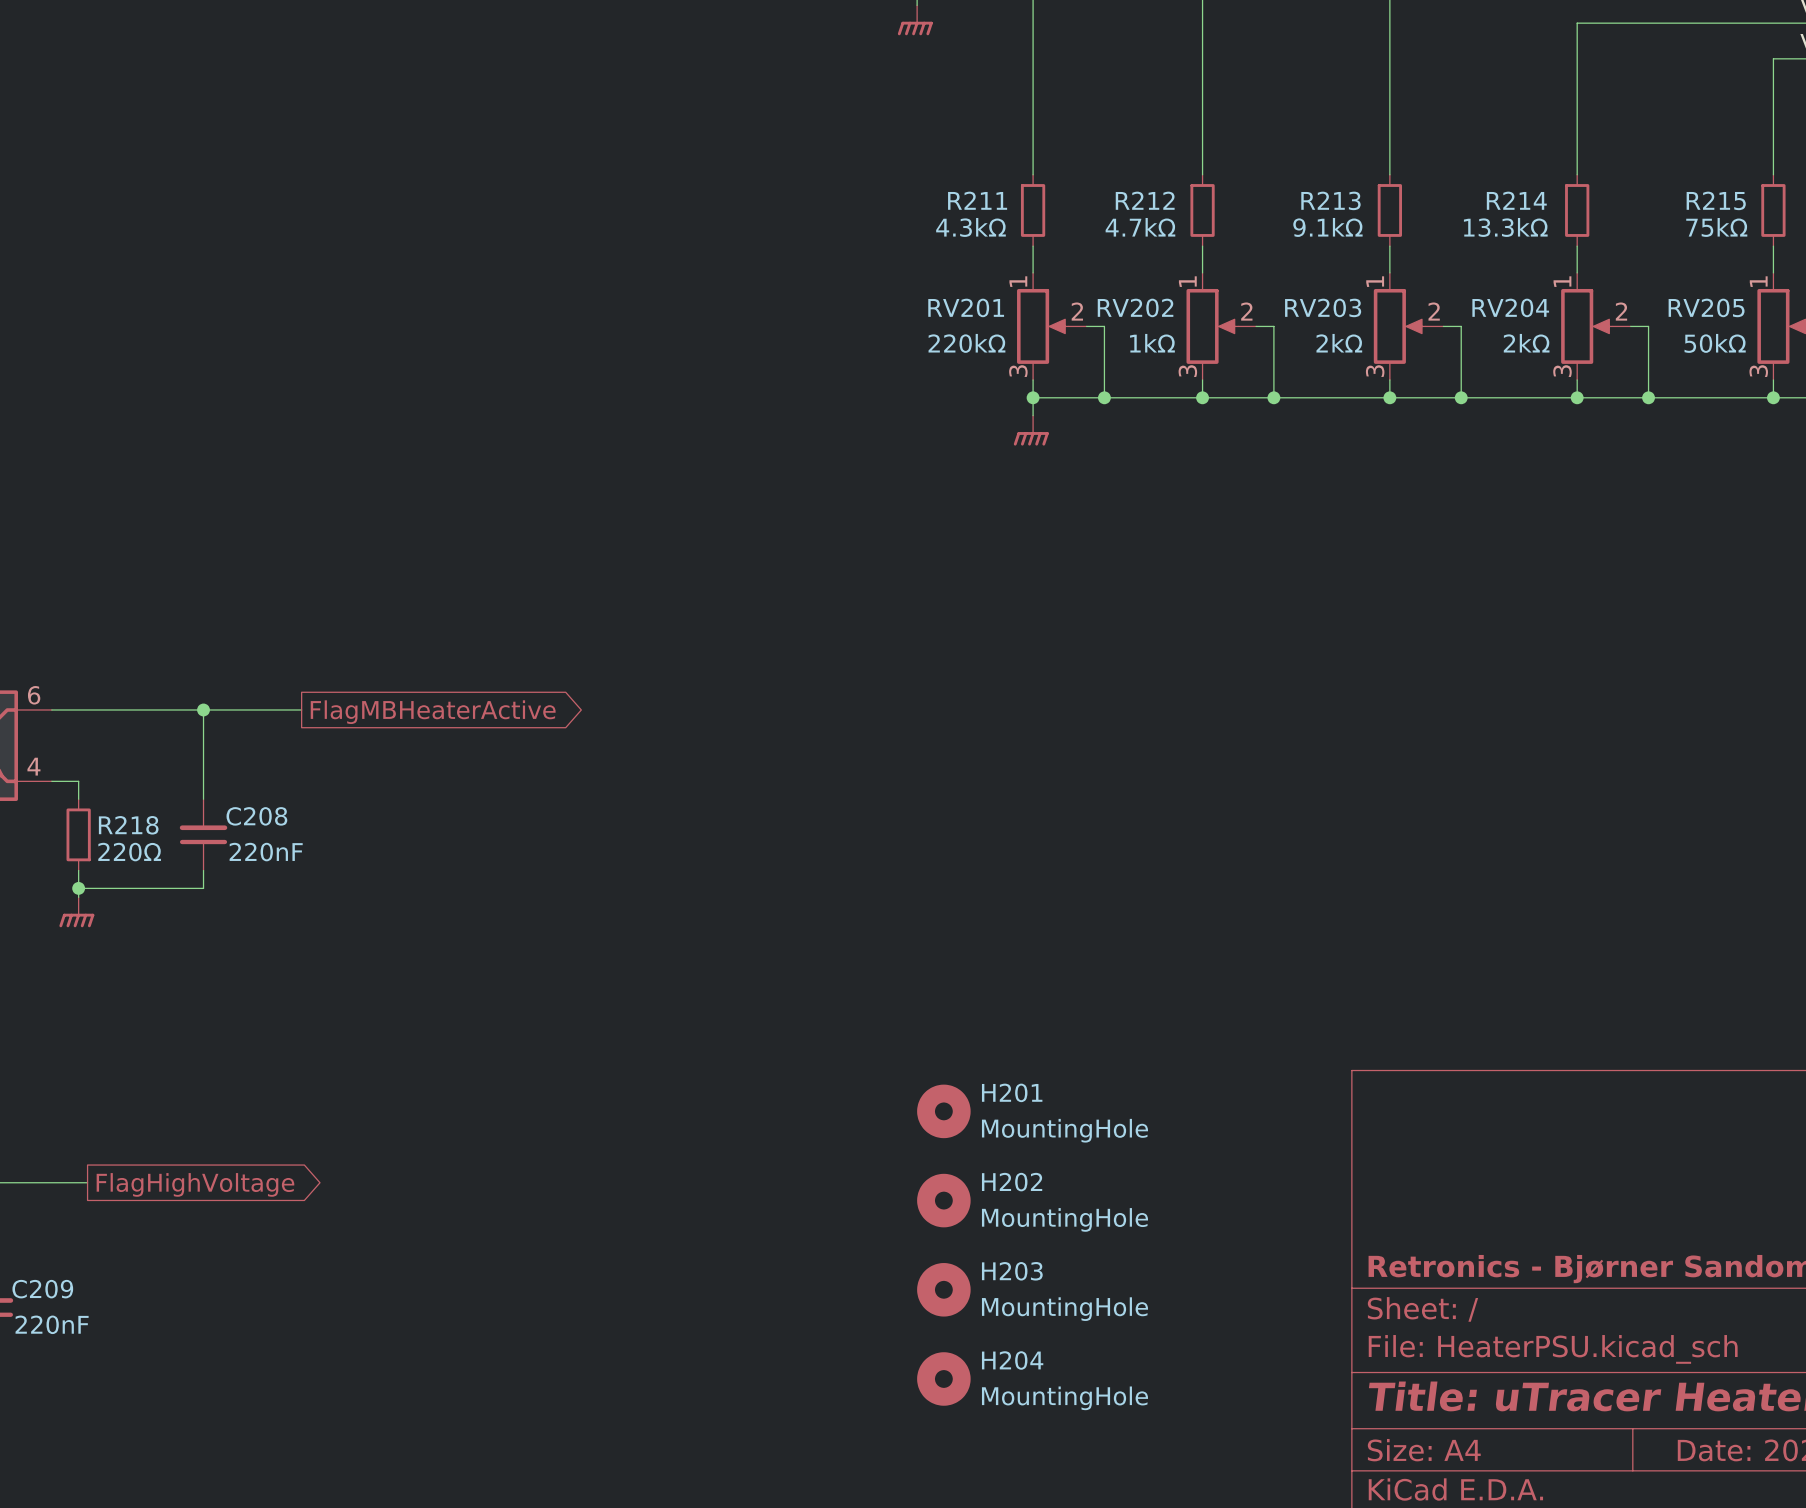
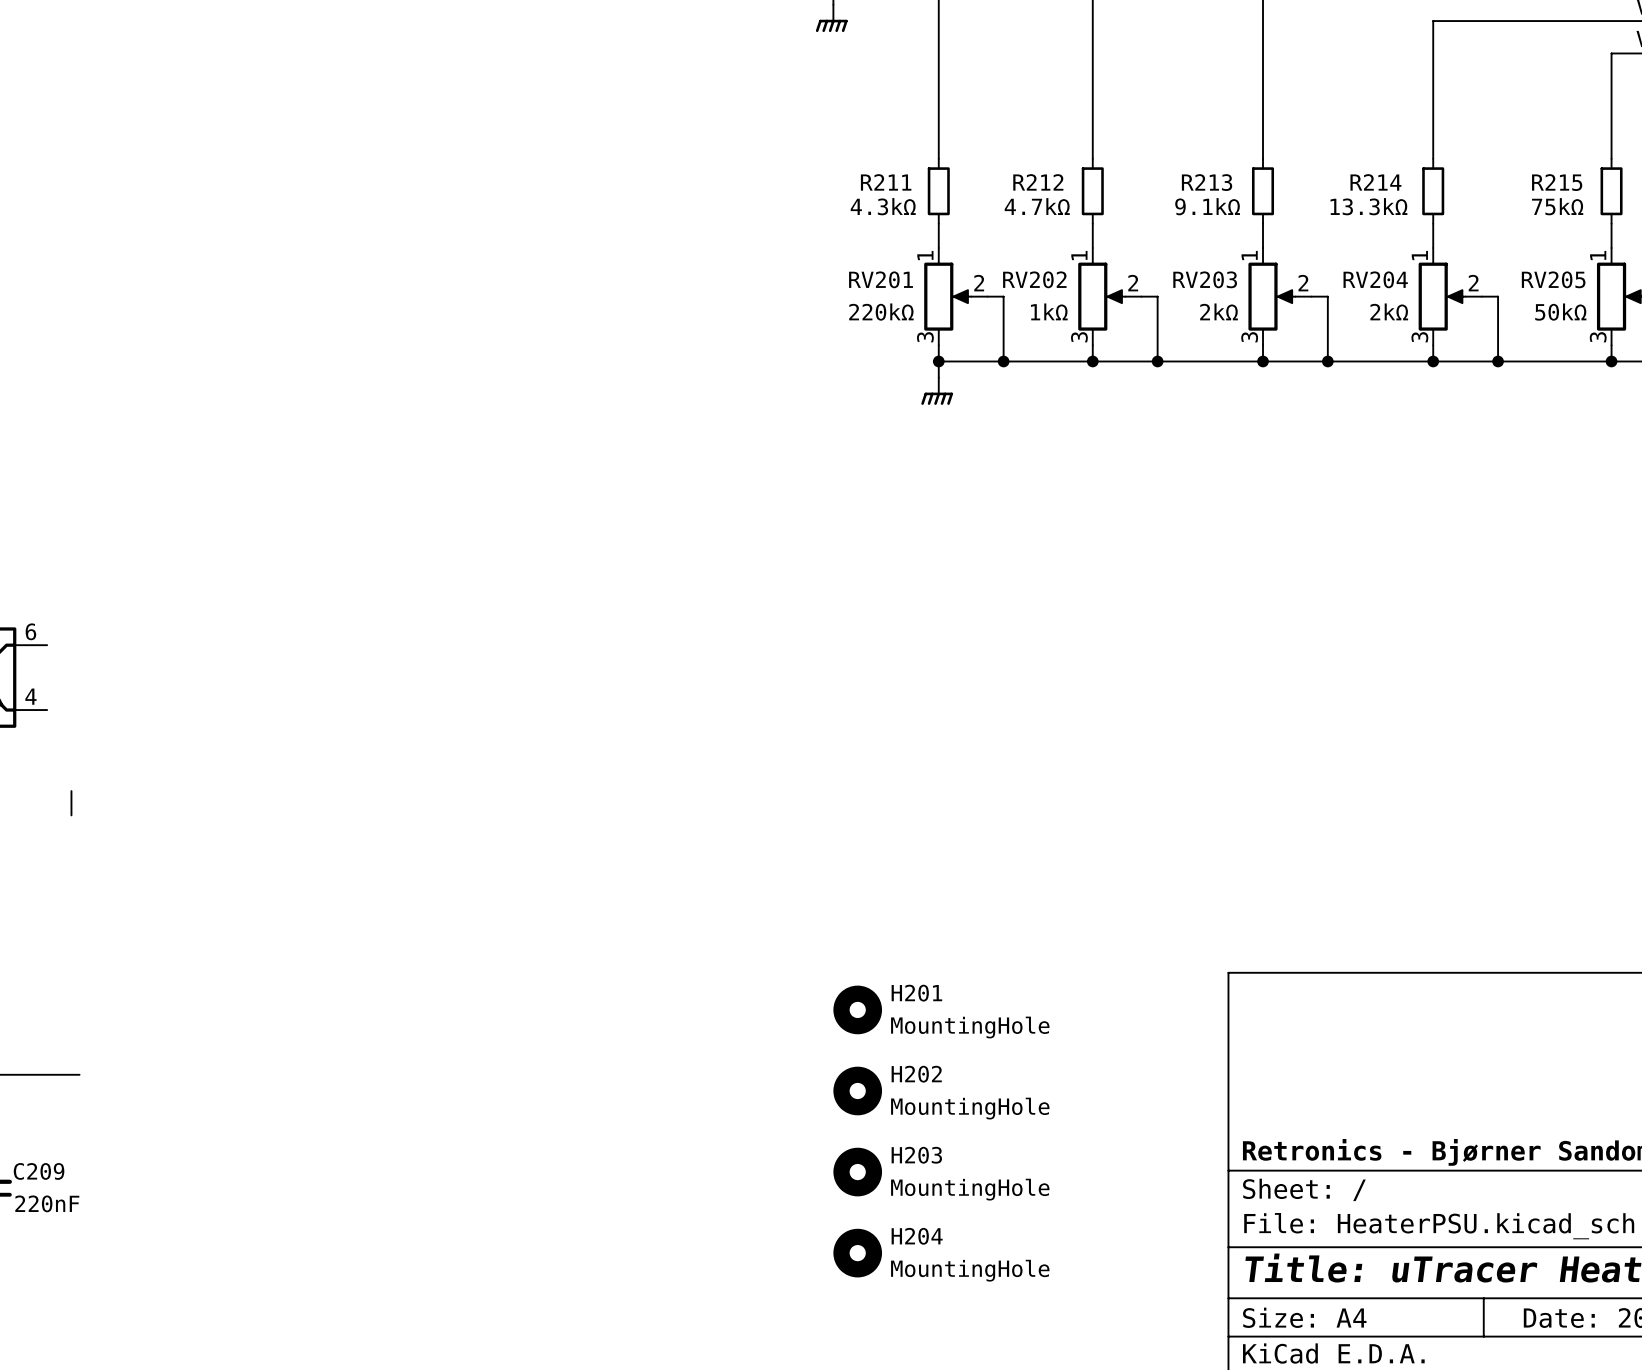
wire: (51, 709) (301, 709) -> none
wire: (203, 709) (203, 799) -> none
junction: (203, 709) -> none
global label: FlagMBHeaterActive (433, 712) -> none
wire: (51, 781) (78, 781) (78, 799) -> none
R218: 220Ω (78, 834) -> none
C208: 220nF (203, 834) -> none
wire: (203, 870) (203, 888) (78, 888) -> none
junction: (78, 888) -> none
power symbol: (76, 912) -> none
global label: FlagHighVoltage (195, 1184) -> none

